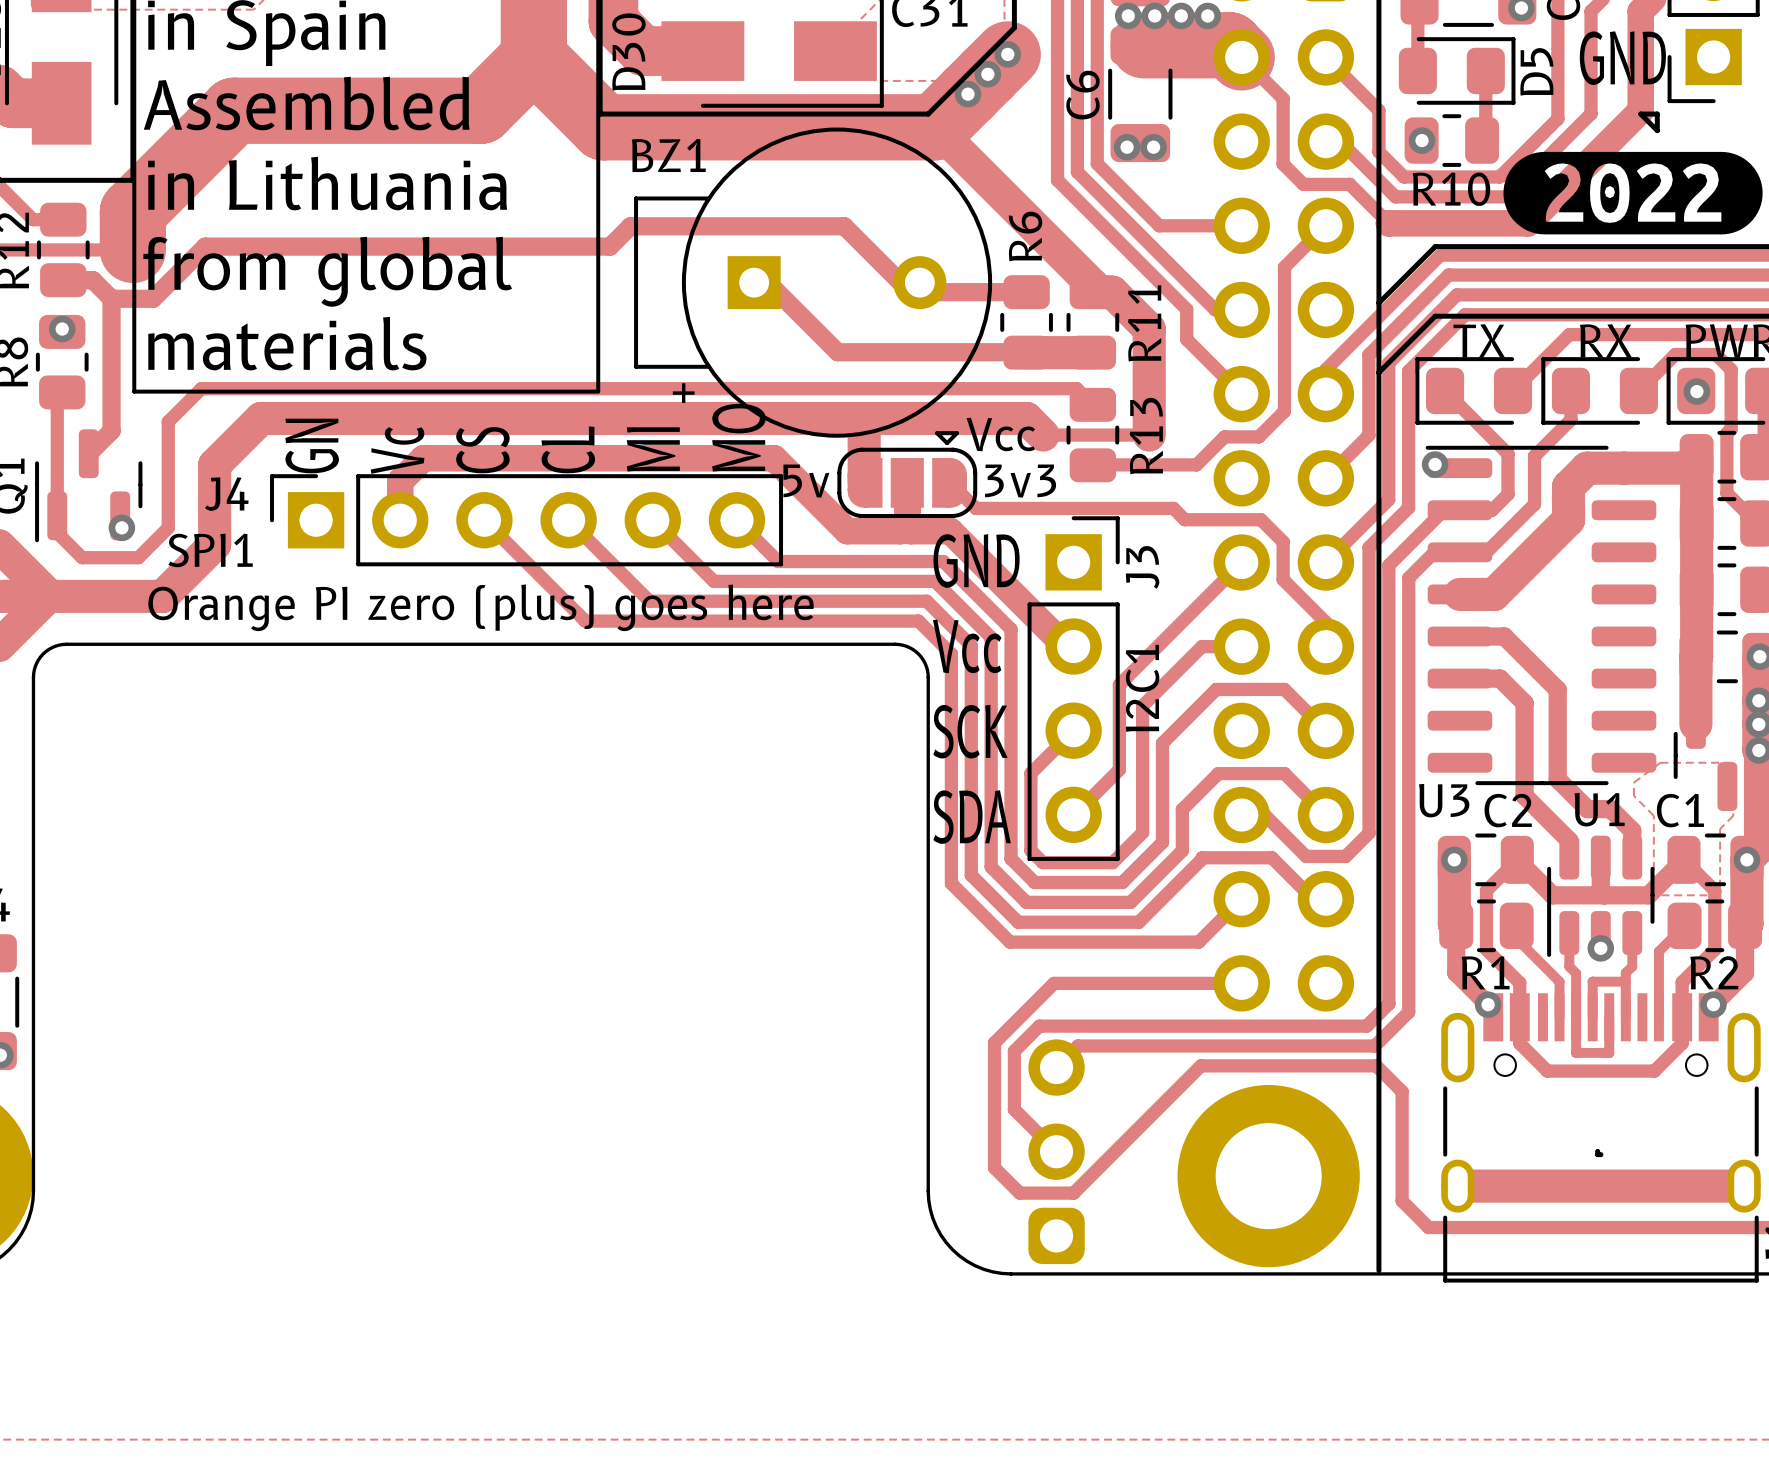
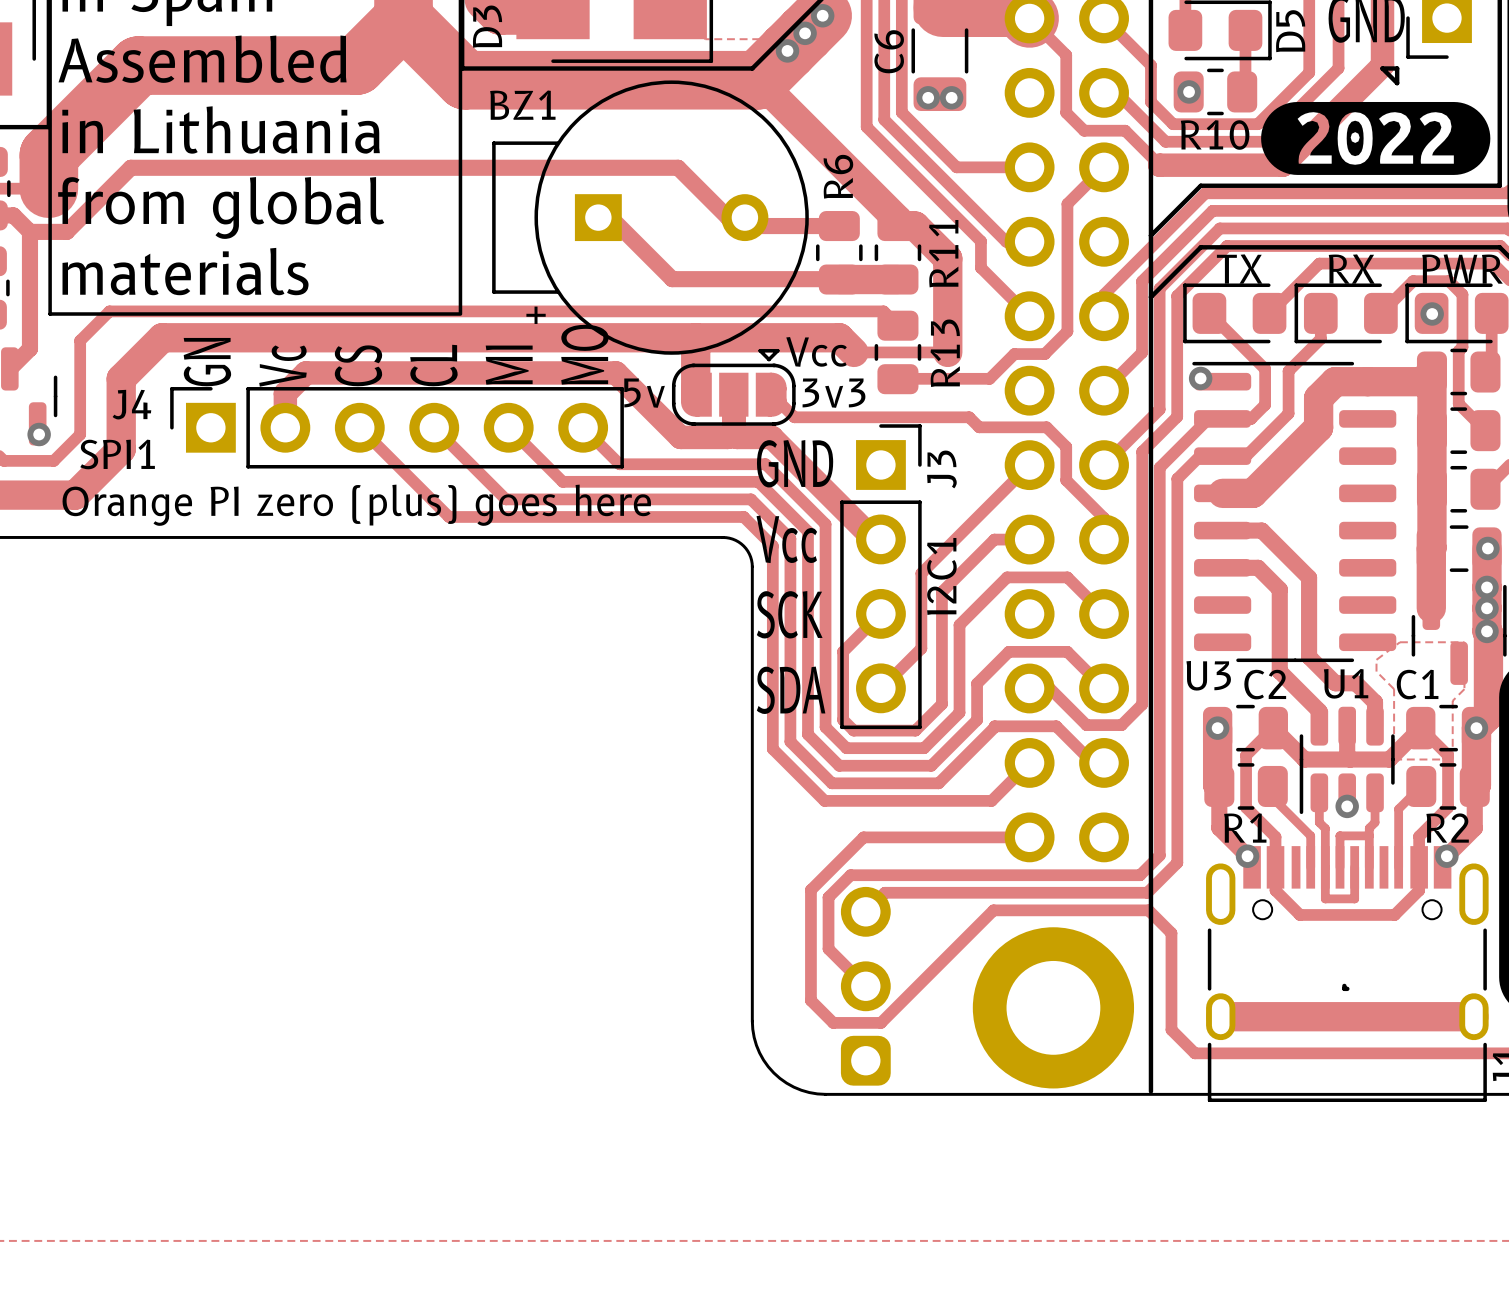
track: (630, 226) (610, 246) (205, 246) -> (488, 167) (130, 167) (112, 185)

